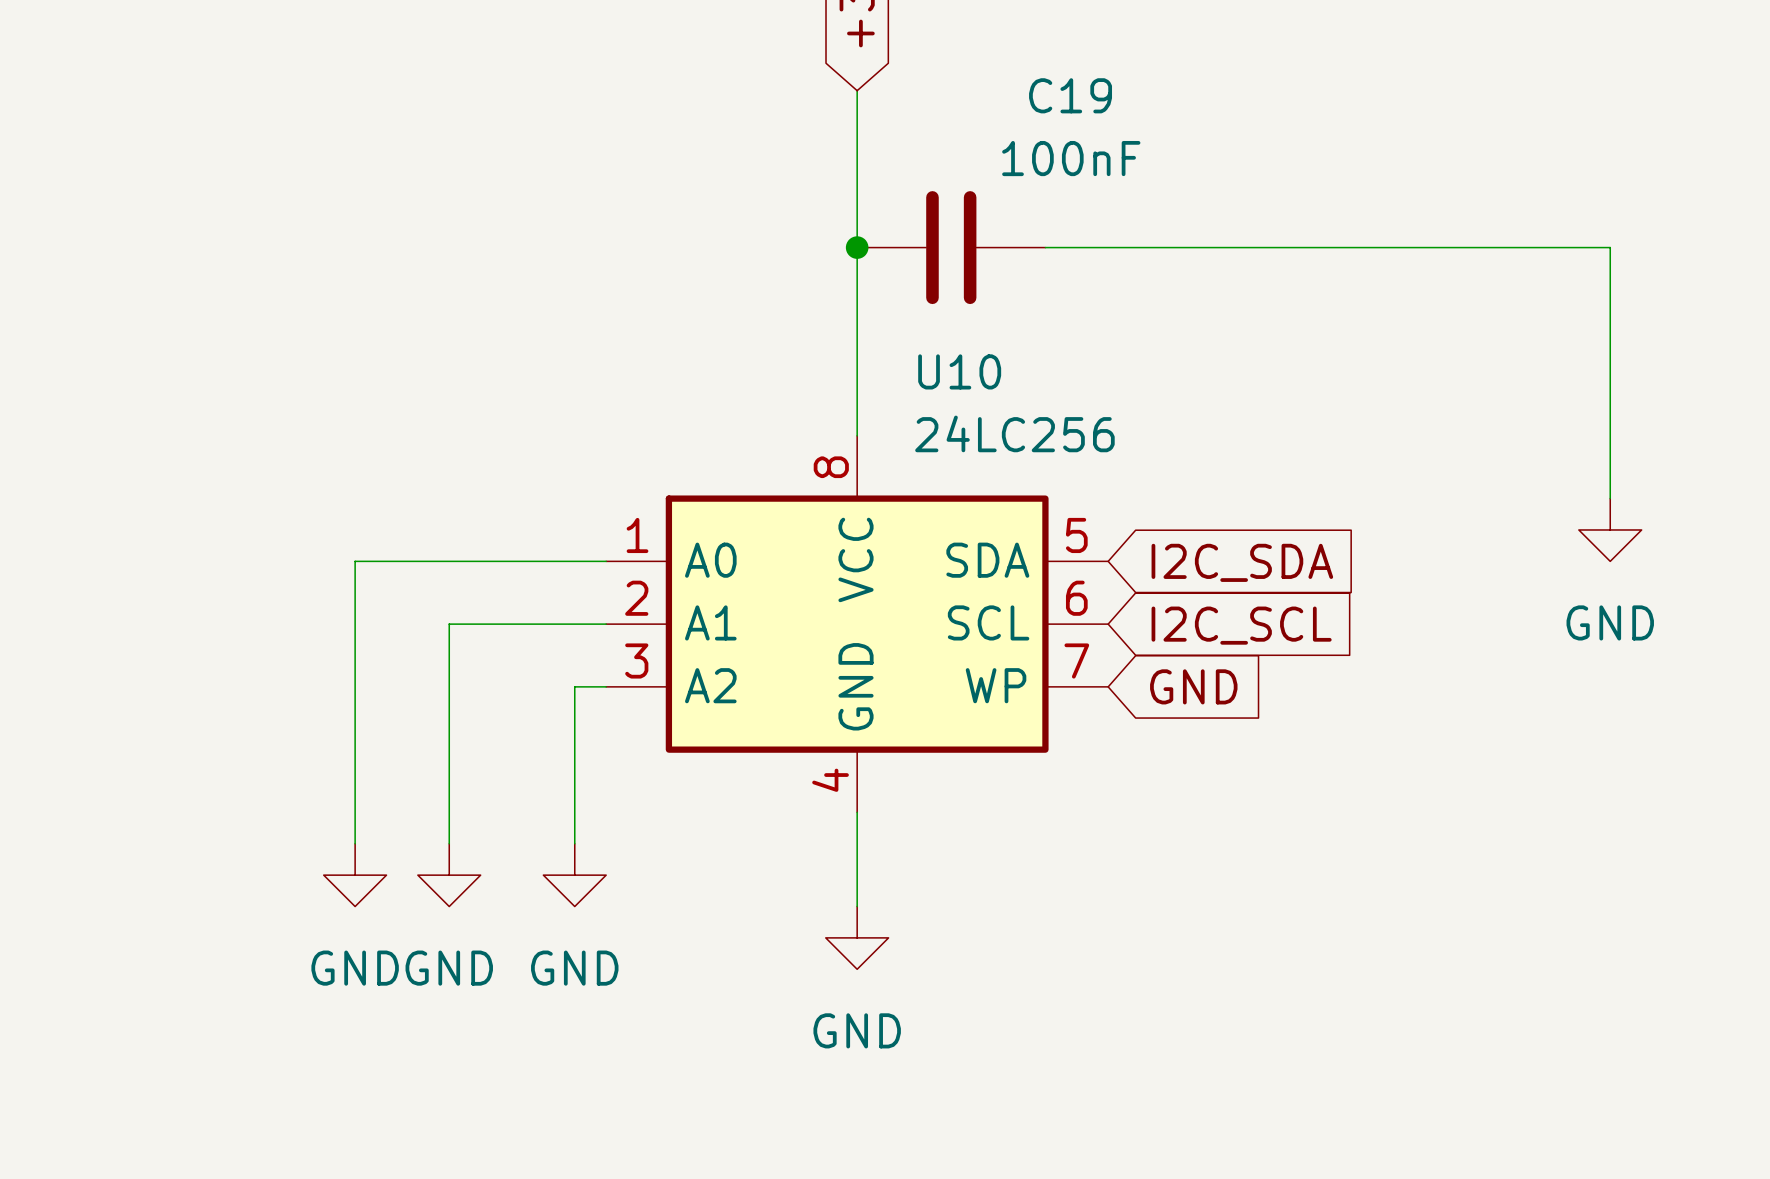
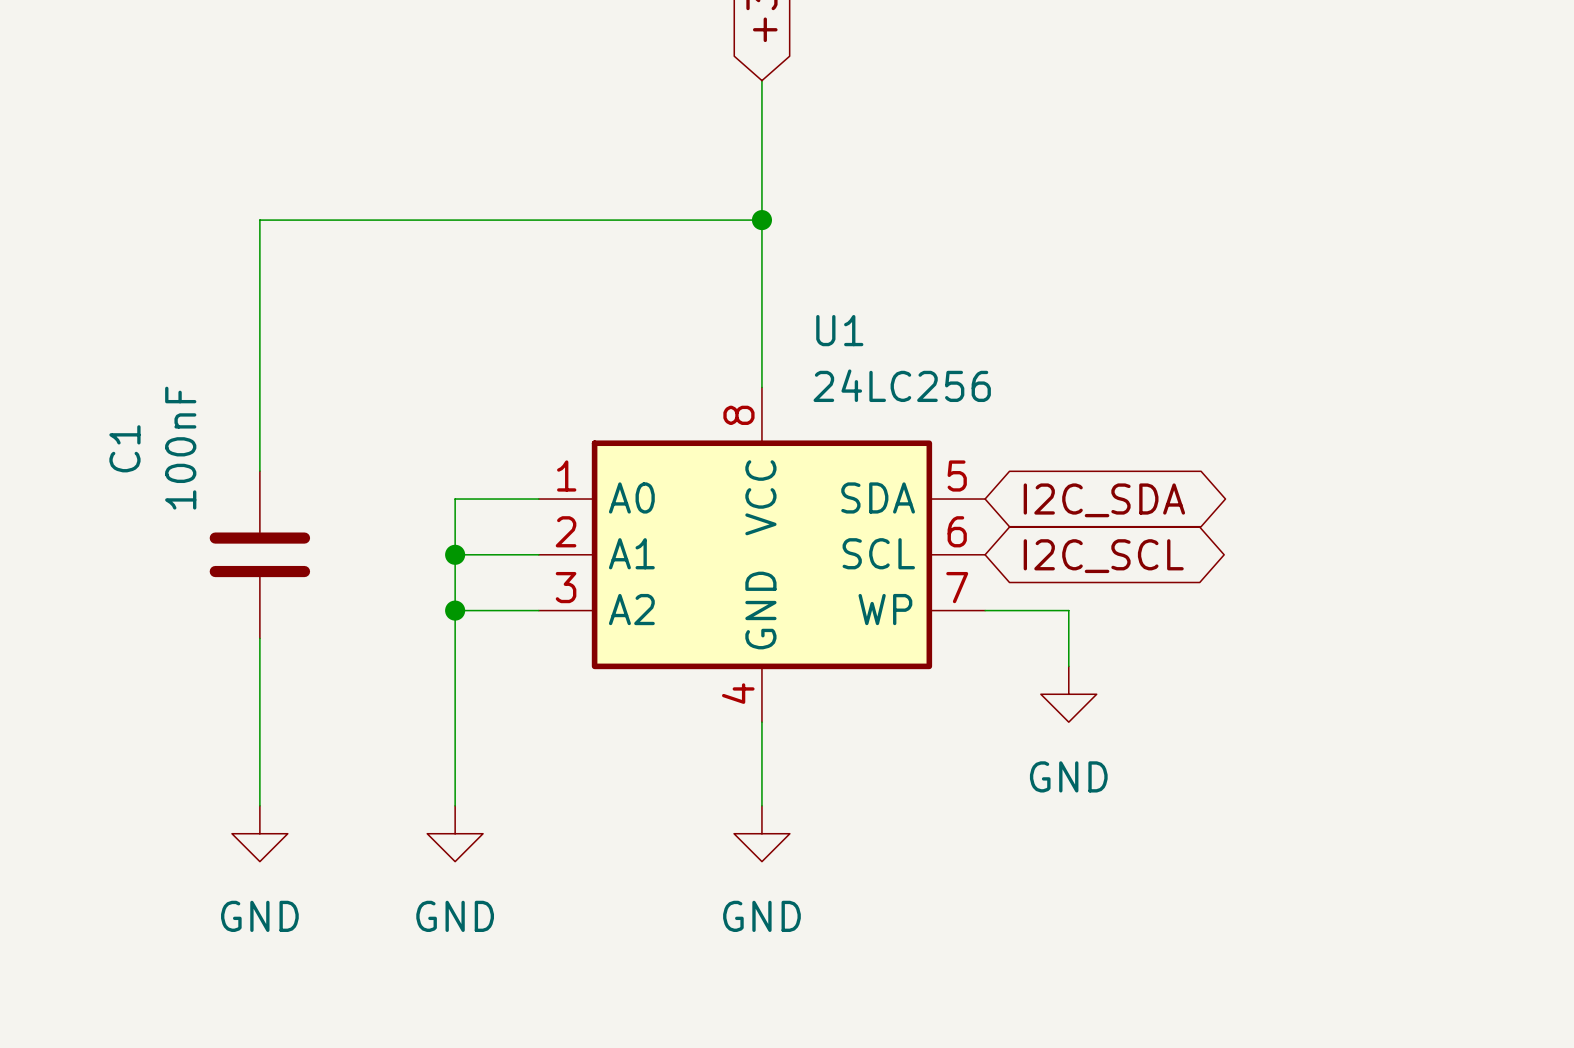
wire: none -> (761, 220) (259, 220) (259, 471)
C19: 100nF (951, 247) -> none
wire: (1045, 247) (1610, 247) (1610, 498) -> none
U10 name: U10 (959, 371) -> U1 (839, 330)
power symbol: GND (1610, 529) -> none
wire: (512, 561) (355, 561) (355, 843) -> (455, 499) (455, 805)
global label shape: input (1242, 562) -> bidirectional (1104, 500)
C1: none -> 100nF (259, 554)
wire: (512, 624) (449, 624) (449, 843) -> none
junction: none -> (455, 554)
global label shape: input (1241, 625) -> bidirectional (1103, 556)
junction: none -> (455, 610)
wire: (574, 686) (574, 843) -> (510, 610) (455, 610)
wire: none -> (985, 610) (1068, 610) (1068, 666)
global label: GND (1193, 686) -> none
wire: none -> (259, 638) (259, 805)
power symbol: none -> GND (1068, 694)
power symbol: GND (355, 875) -> none
power symbol: GND (449, 875) -> none
power symbol: GND (574, 875) -> none
power symbol: none -> GND (259, 833)
power symbol: none -> GND (455, 833)

